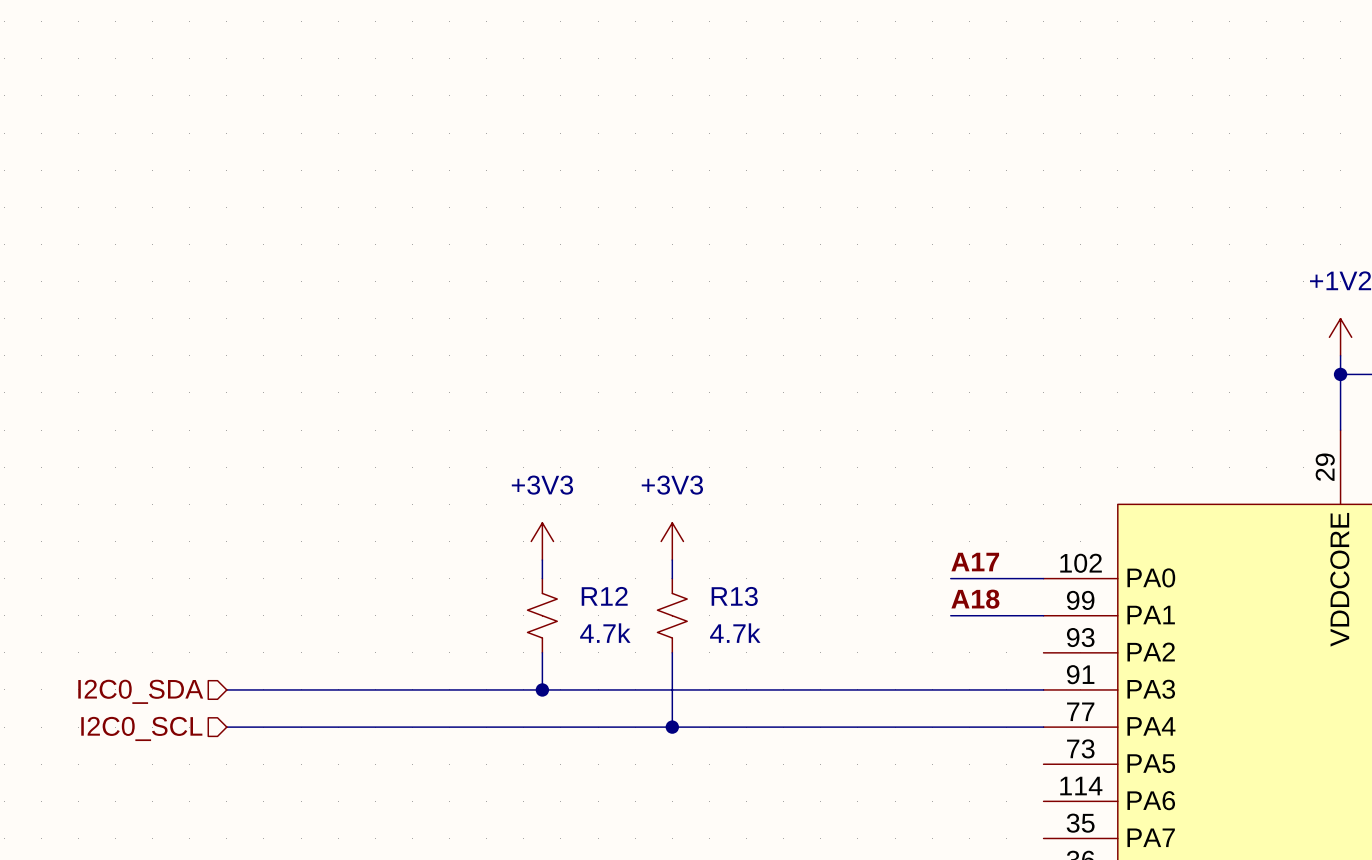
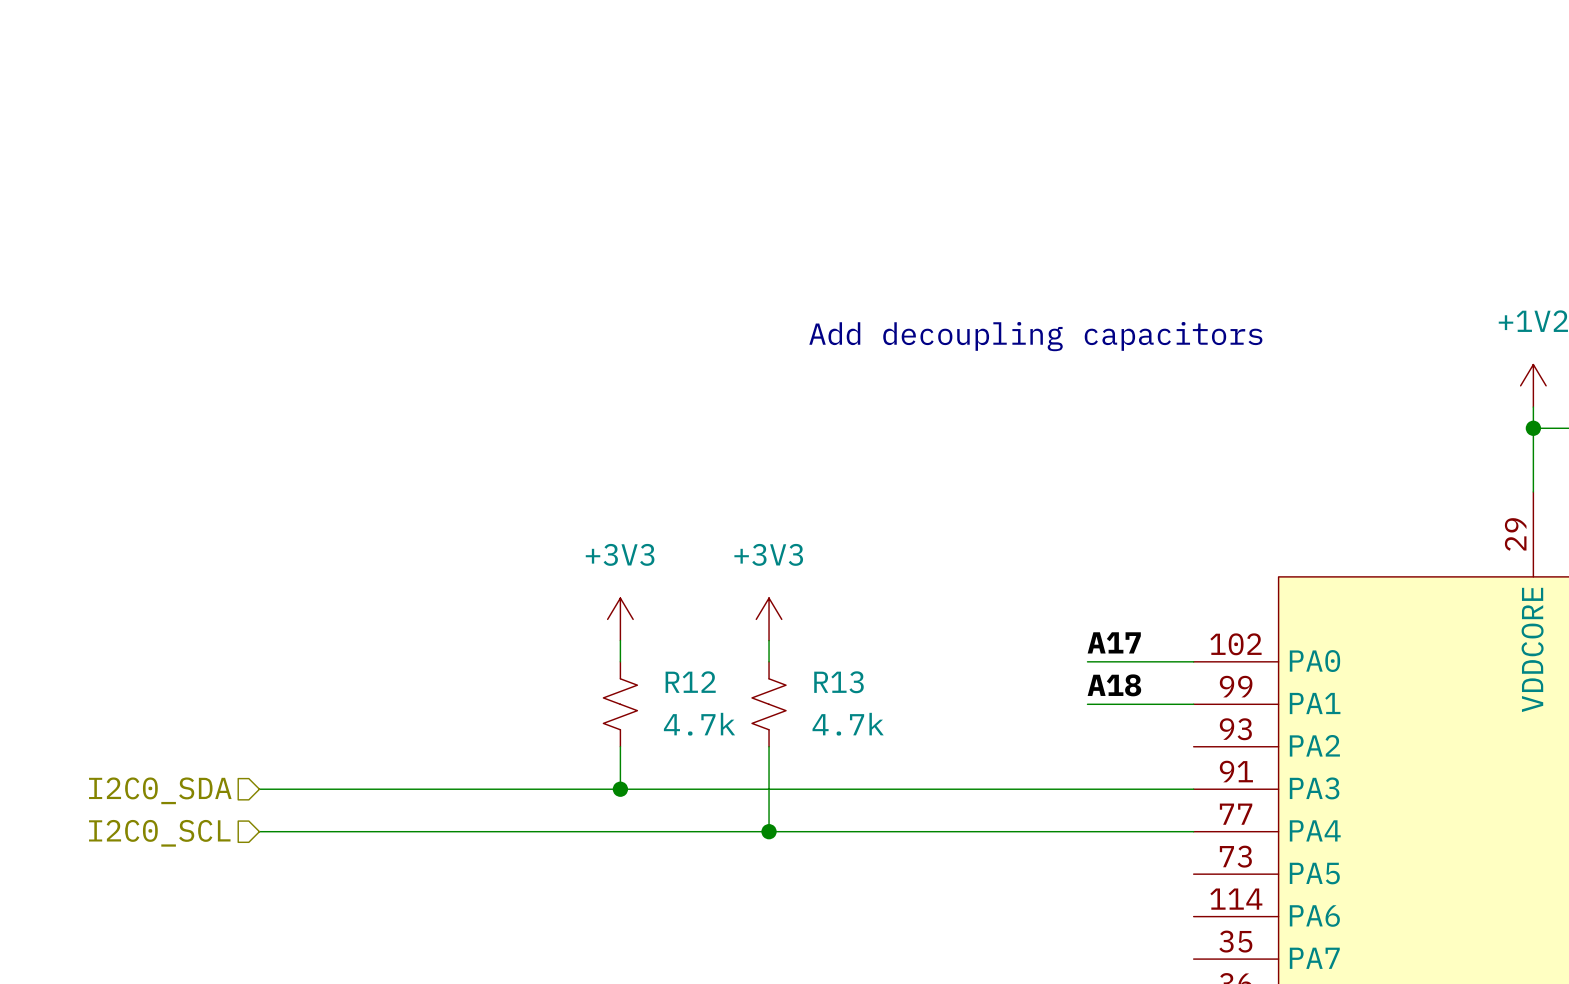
text: none -> Add decoupling capacitors (1035, 336)

